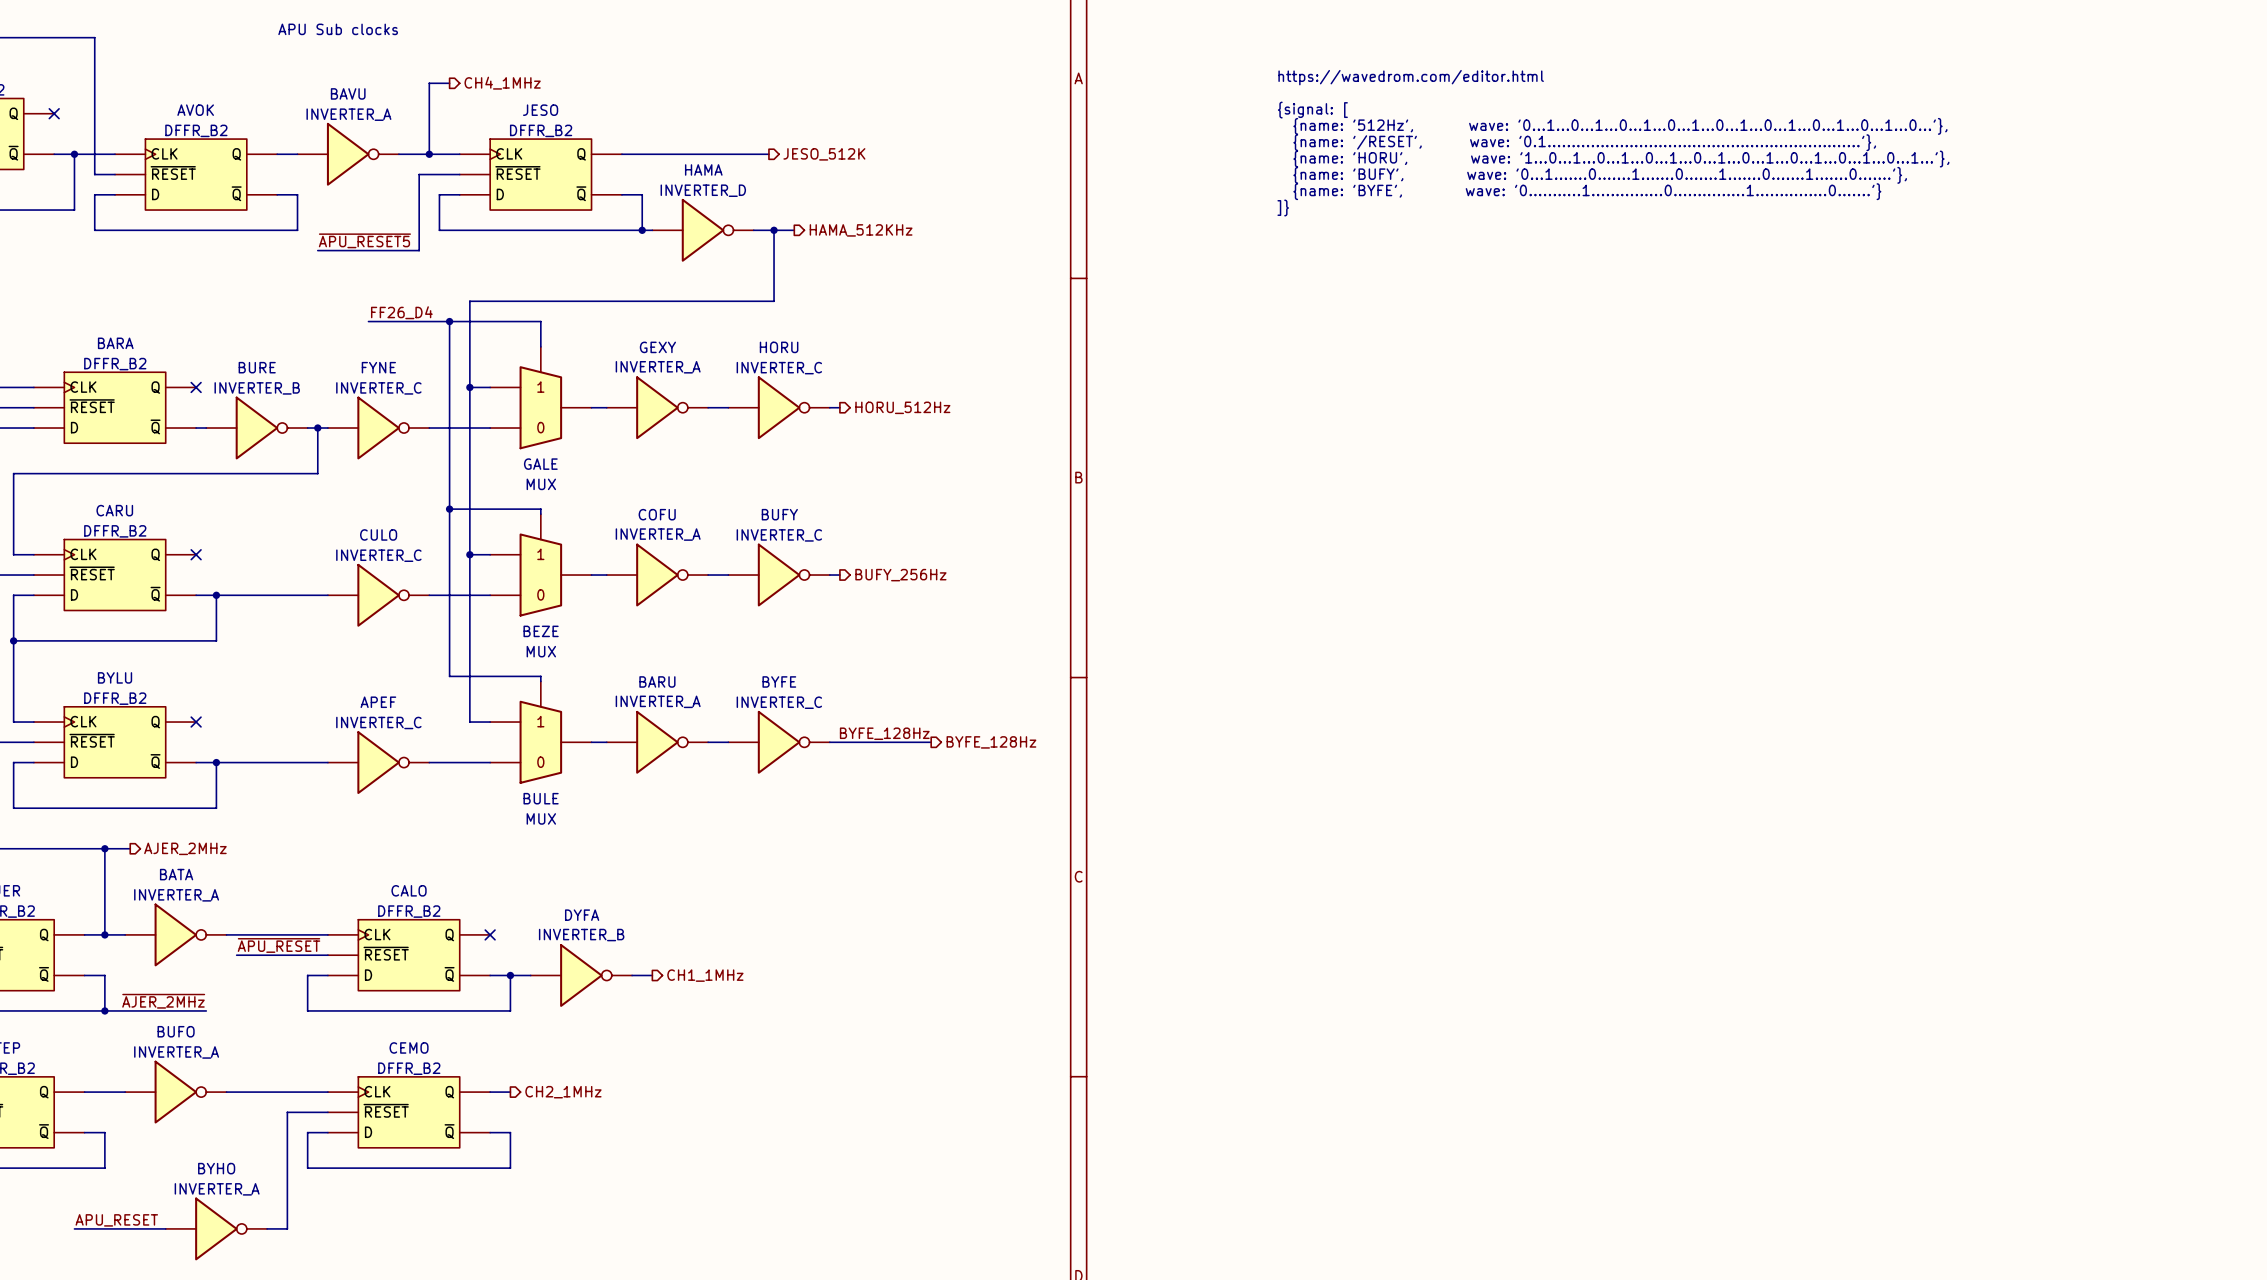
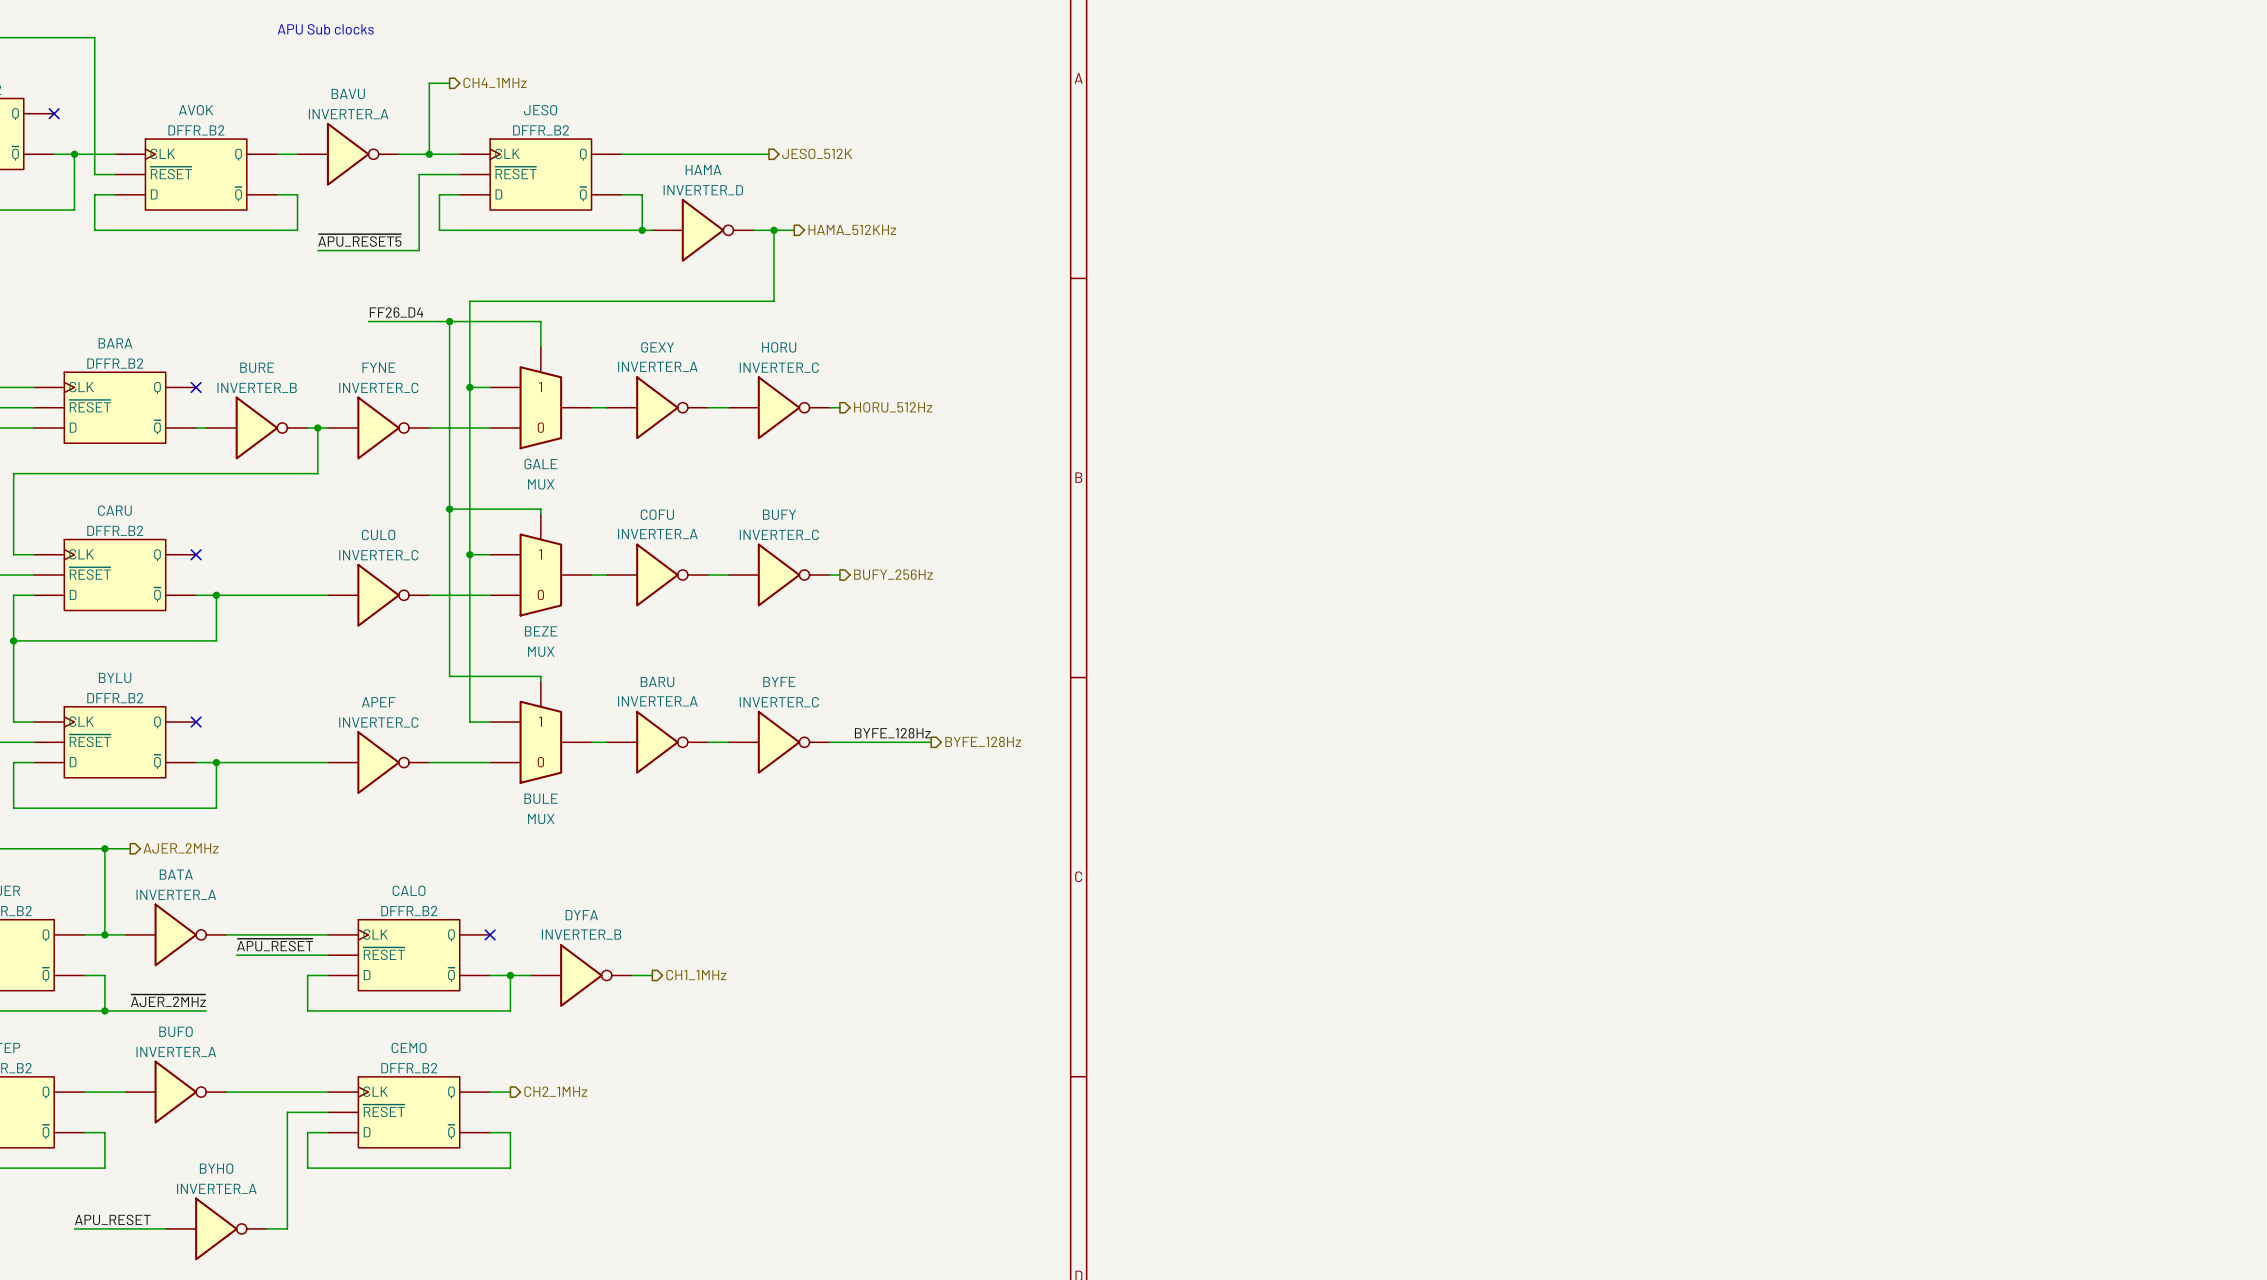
text: https://wavedrom.com/editor.html (1411, 77) -> none
text: {signal: [ (1312, 110) -> none
text: {name: '512Hz', wave: '0...1...0...1...0...1...0...1...0...1...0...1...0...1...0...1...0...'}, (1620, 126) -> none
text: {name: '/RESET', wave: '0.1.................................................................'}, (1584, 142) -> none
text: {name: 'HORU', wave: '1...0...1...0...1...0...1...0...1...0...1...0...1...0...1...0...1...'}, (1621, 159) -> none
text: {name: 'BUFY', wave: '0...1.......0.......1.......0.......1.......0.......1.......0.......'}, (1600, 175) -> none
text: {name: 'BYFE', wave: '0...........1...............0...............1...............0.......'} (1587, 191) -> none
text: ]} (1283, 208) -> none

